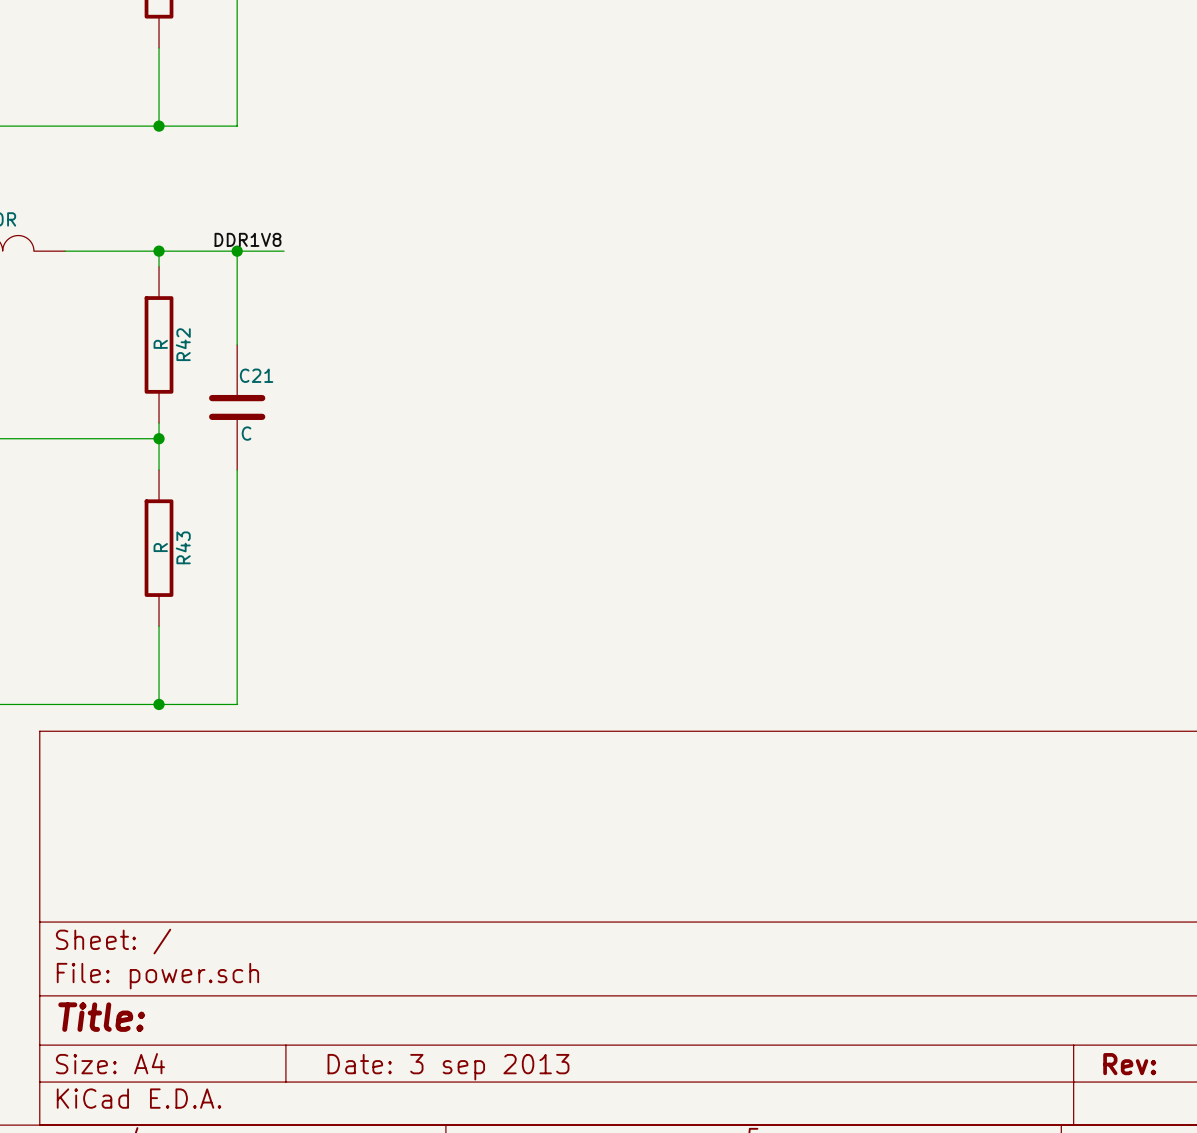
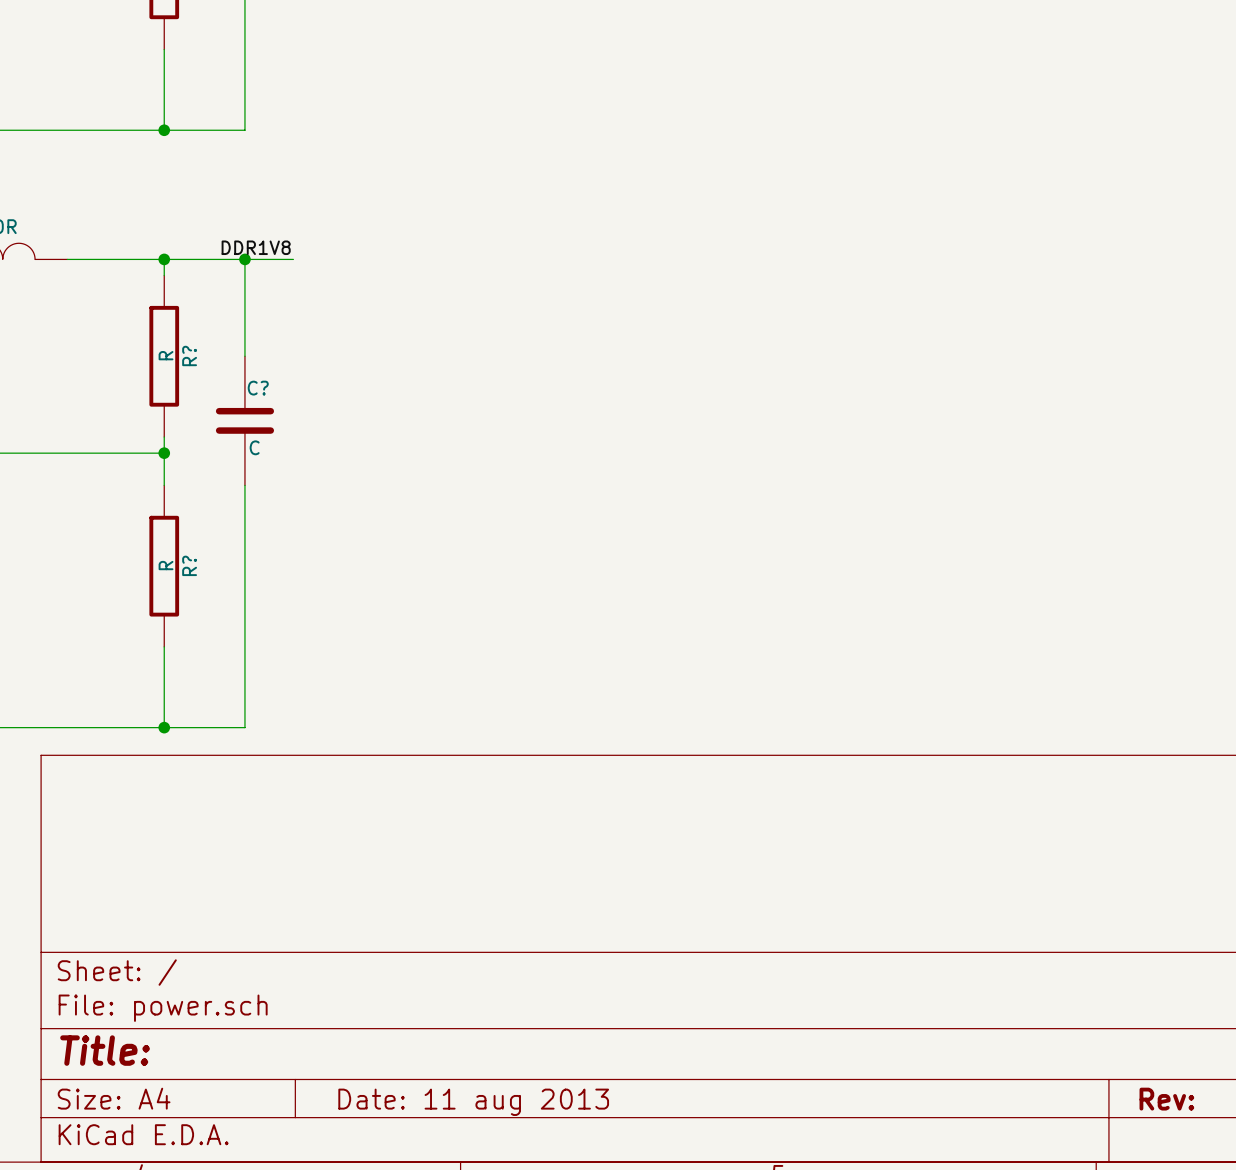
R42 name: R42 (183, 344) -> R? (189, 355)
C21 name: C21 (256, 375) -> C? (258, 388)
R43 name: R43 (183, 547) -> R? (189, 565)
title block: Date: 3 sep 2013 (448, 1067) -> Date: 11 aug 2013 (473, 1102)

